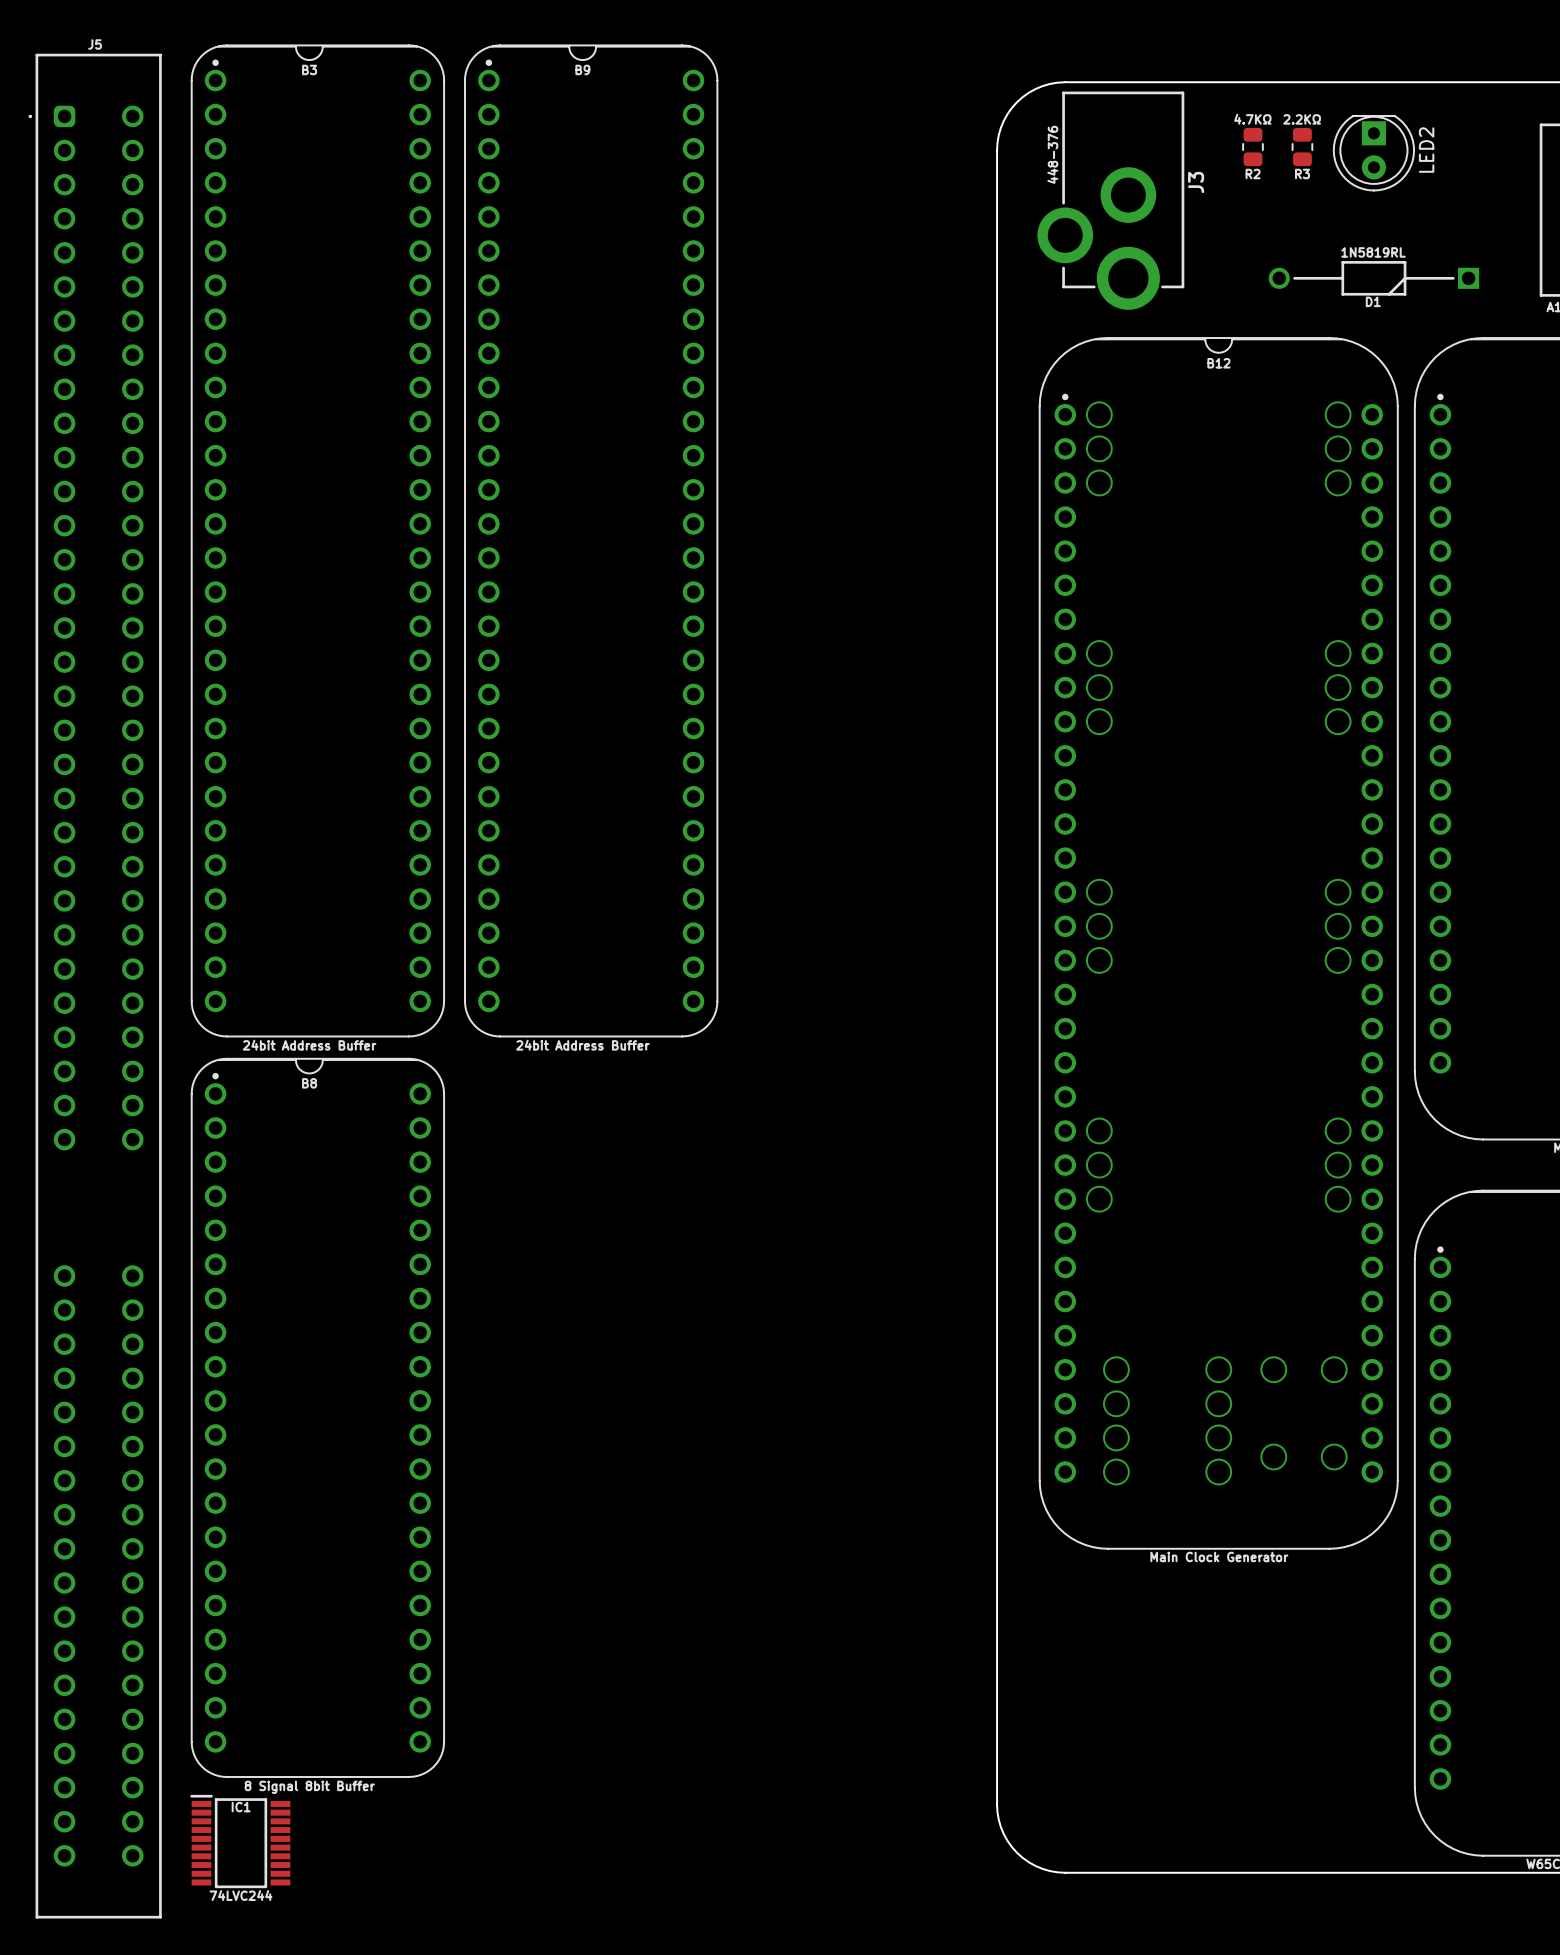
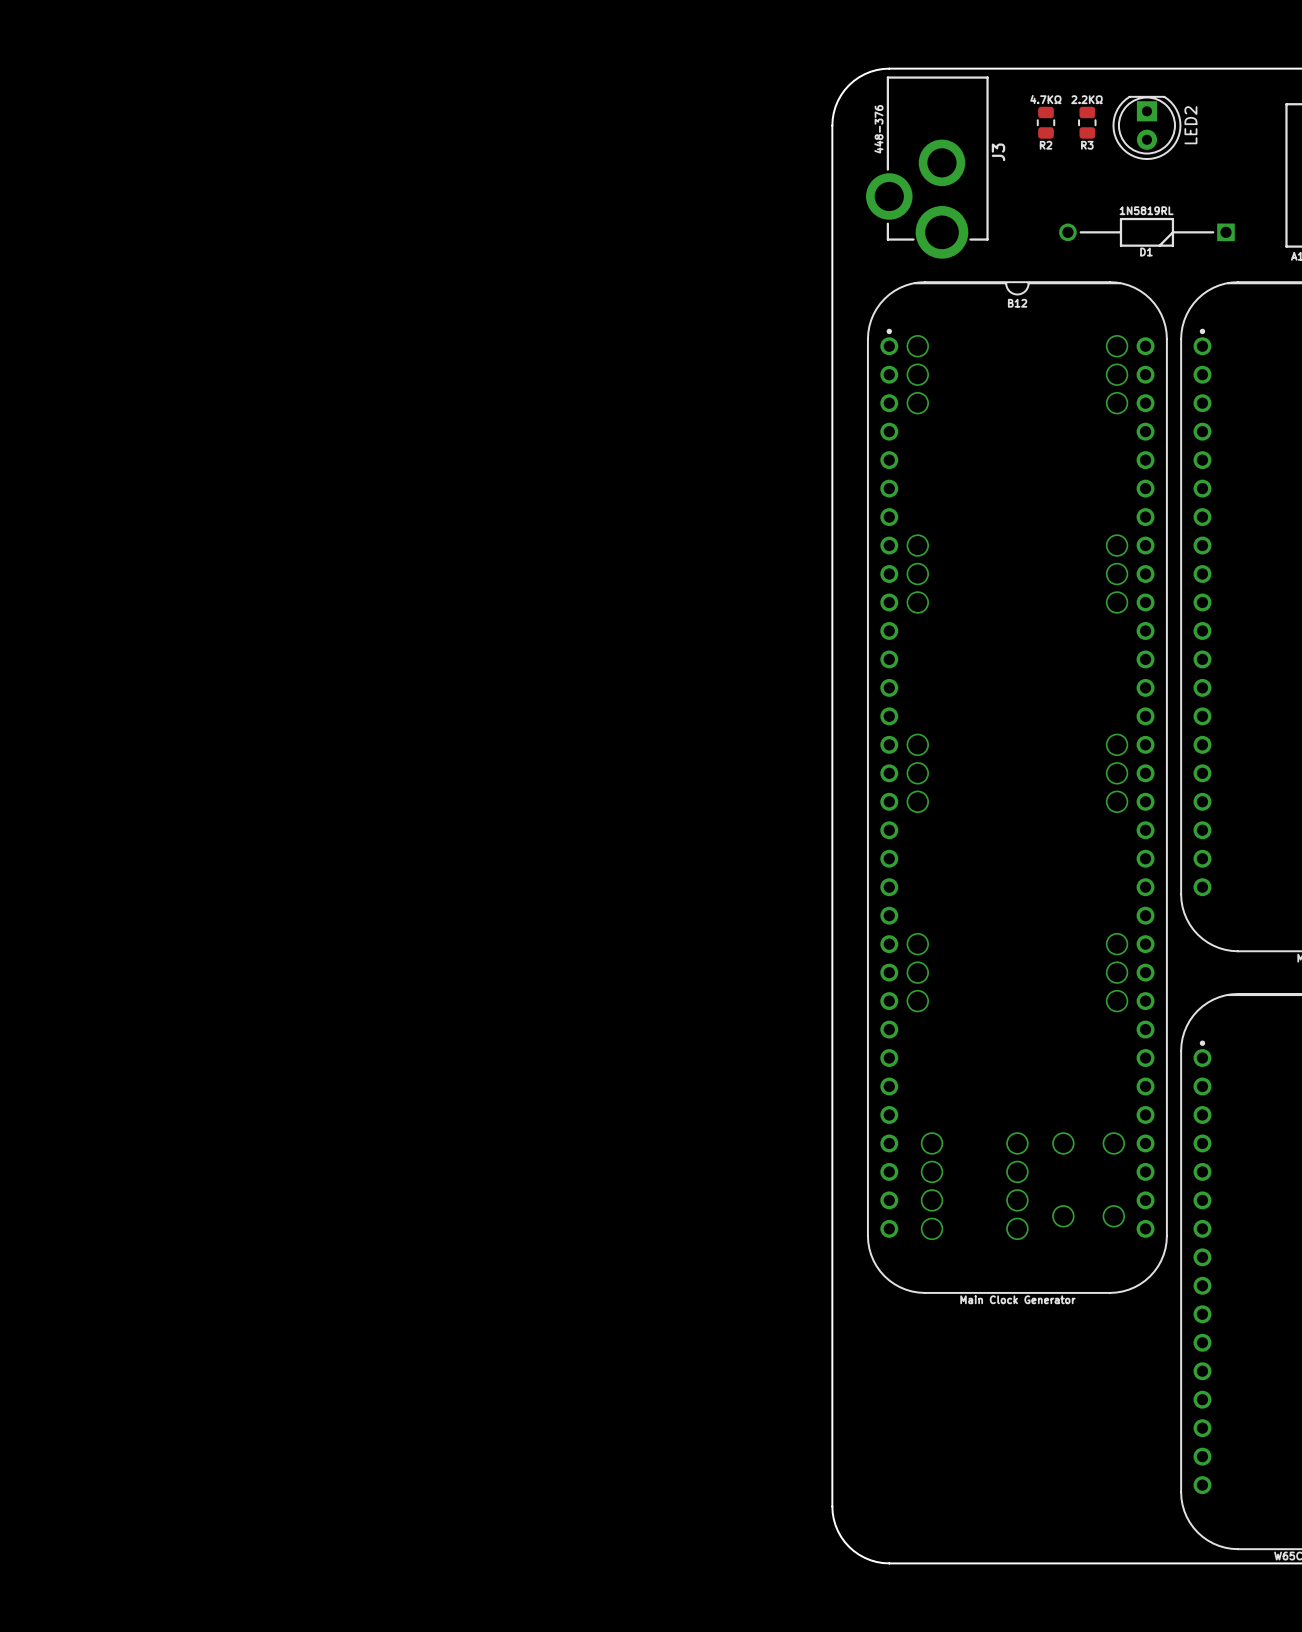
B3: (317, 540) -> none
B9: (591, 540) -> none
J5: (95, 986) -> none
B8: (317, 1417) -> none
IC1: (240, 1841) -> none

